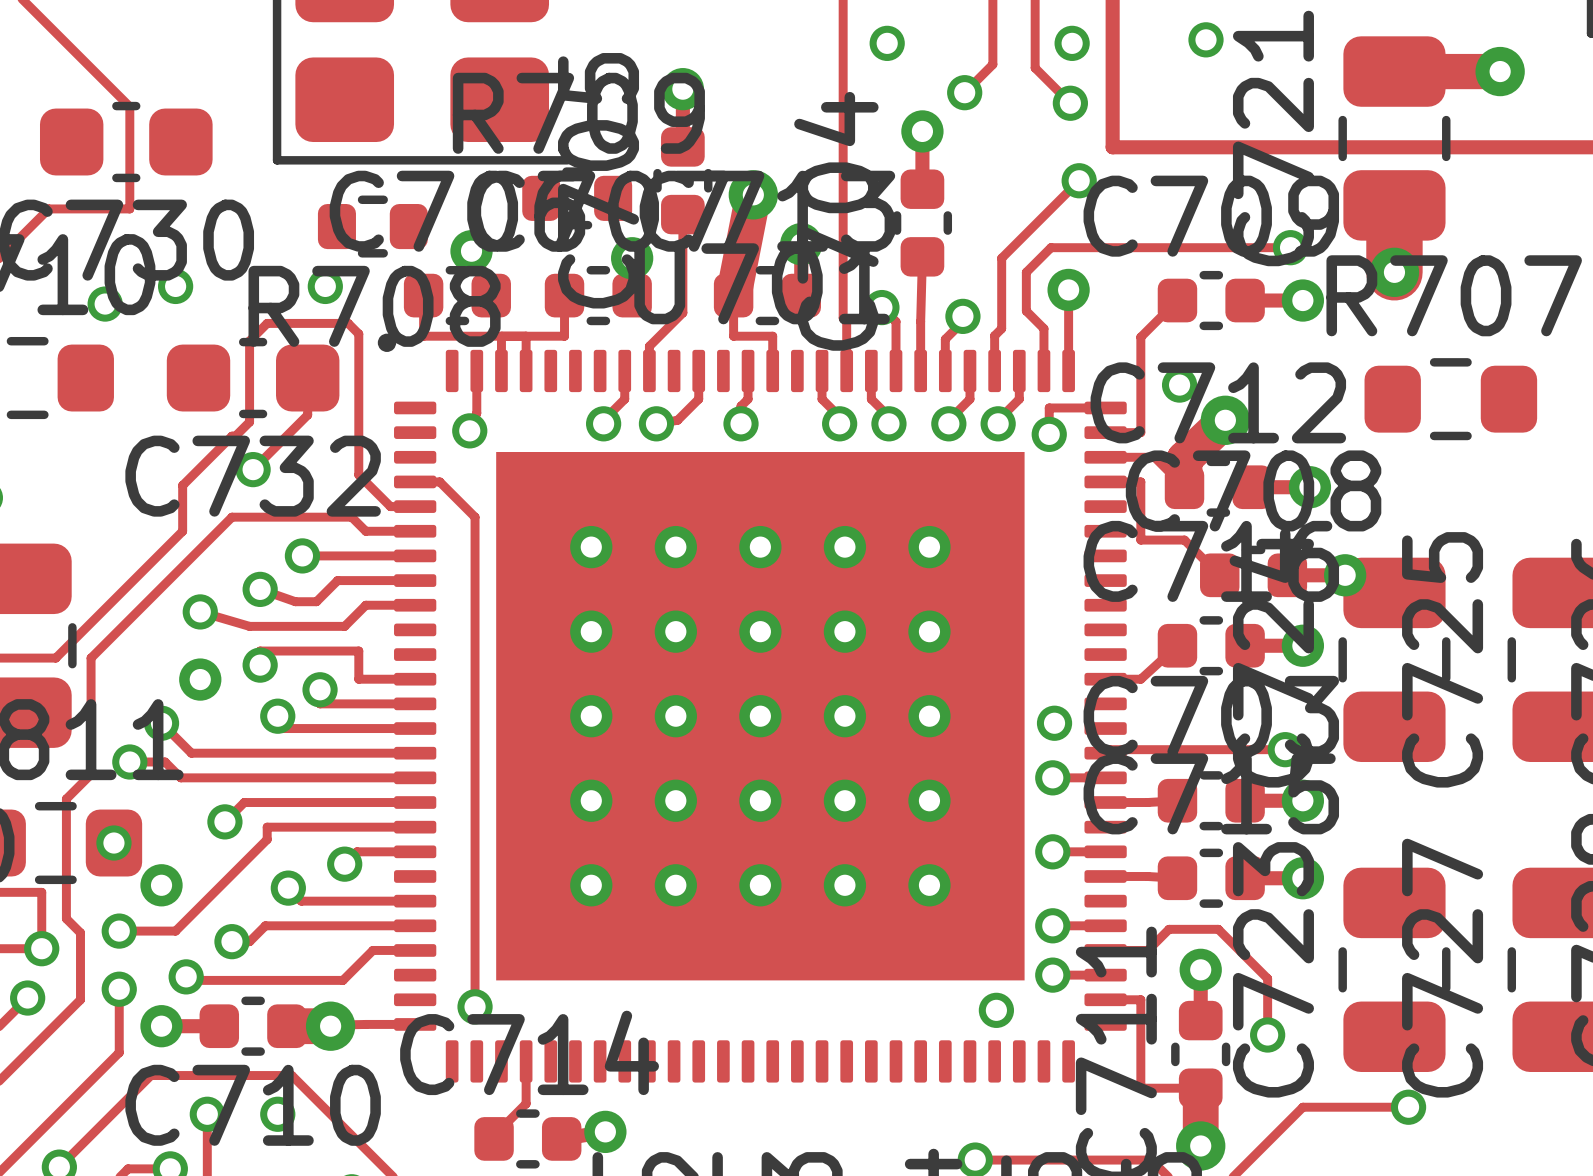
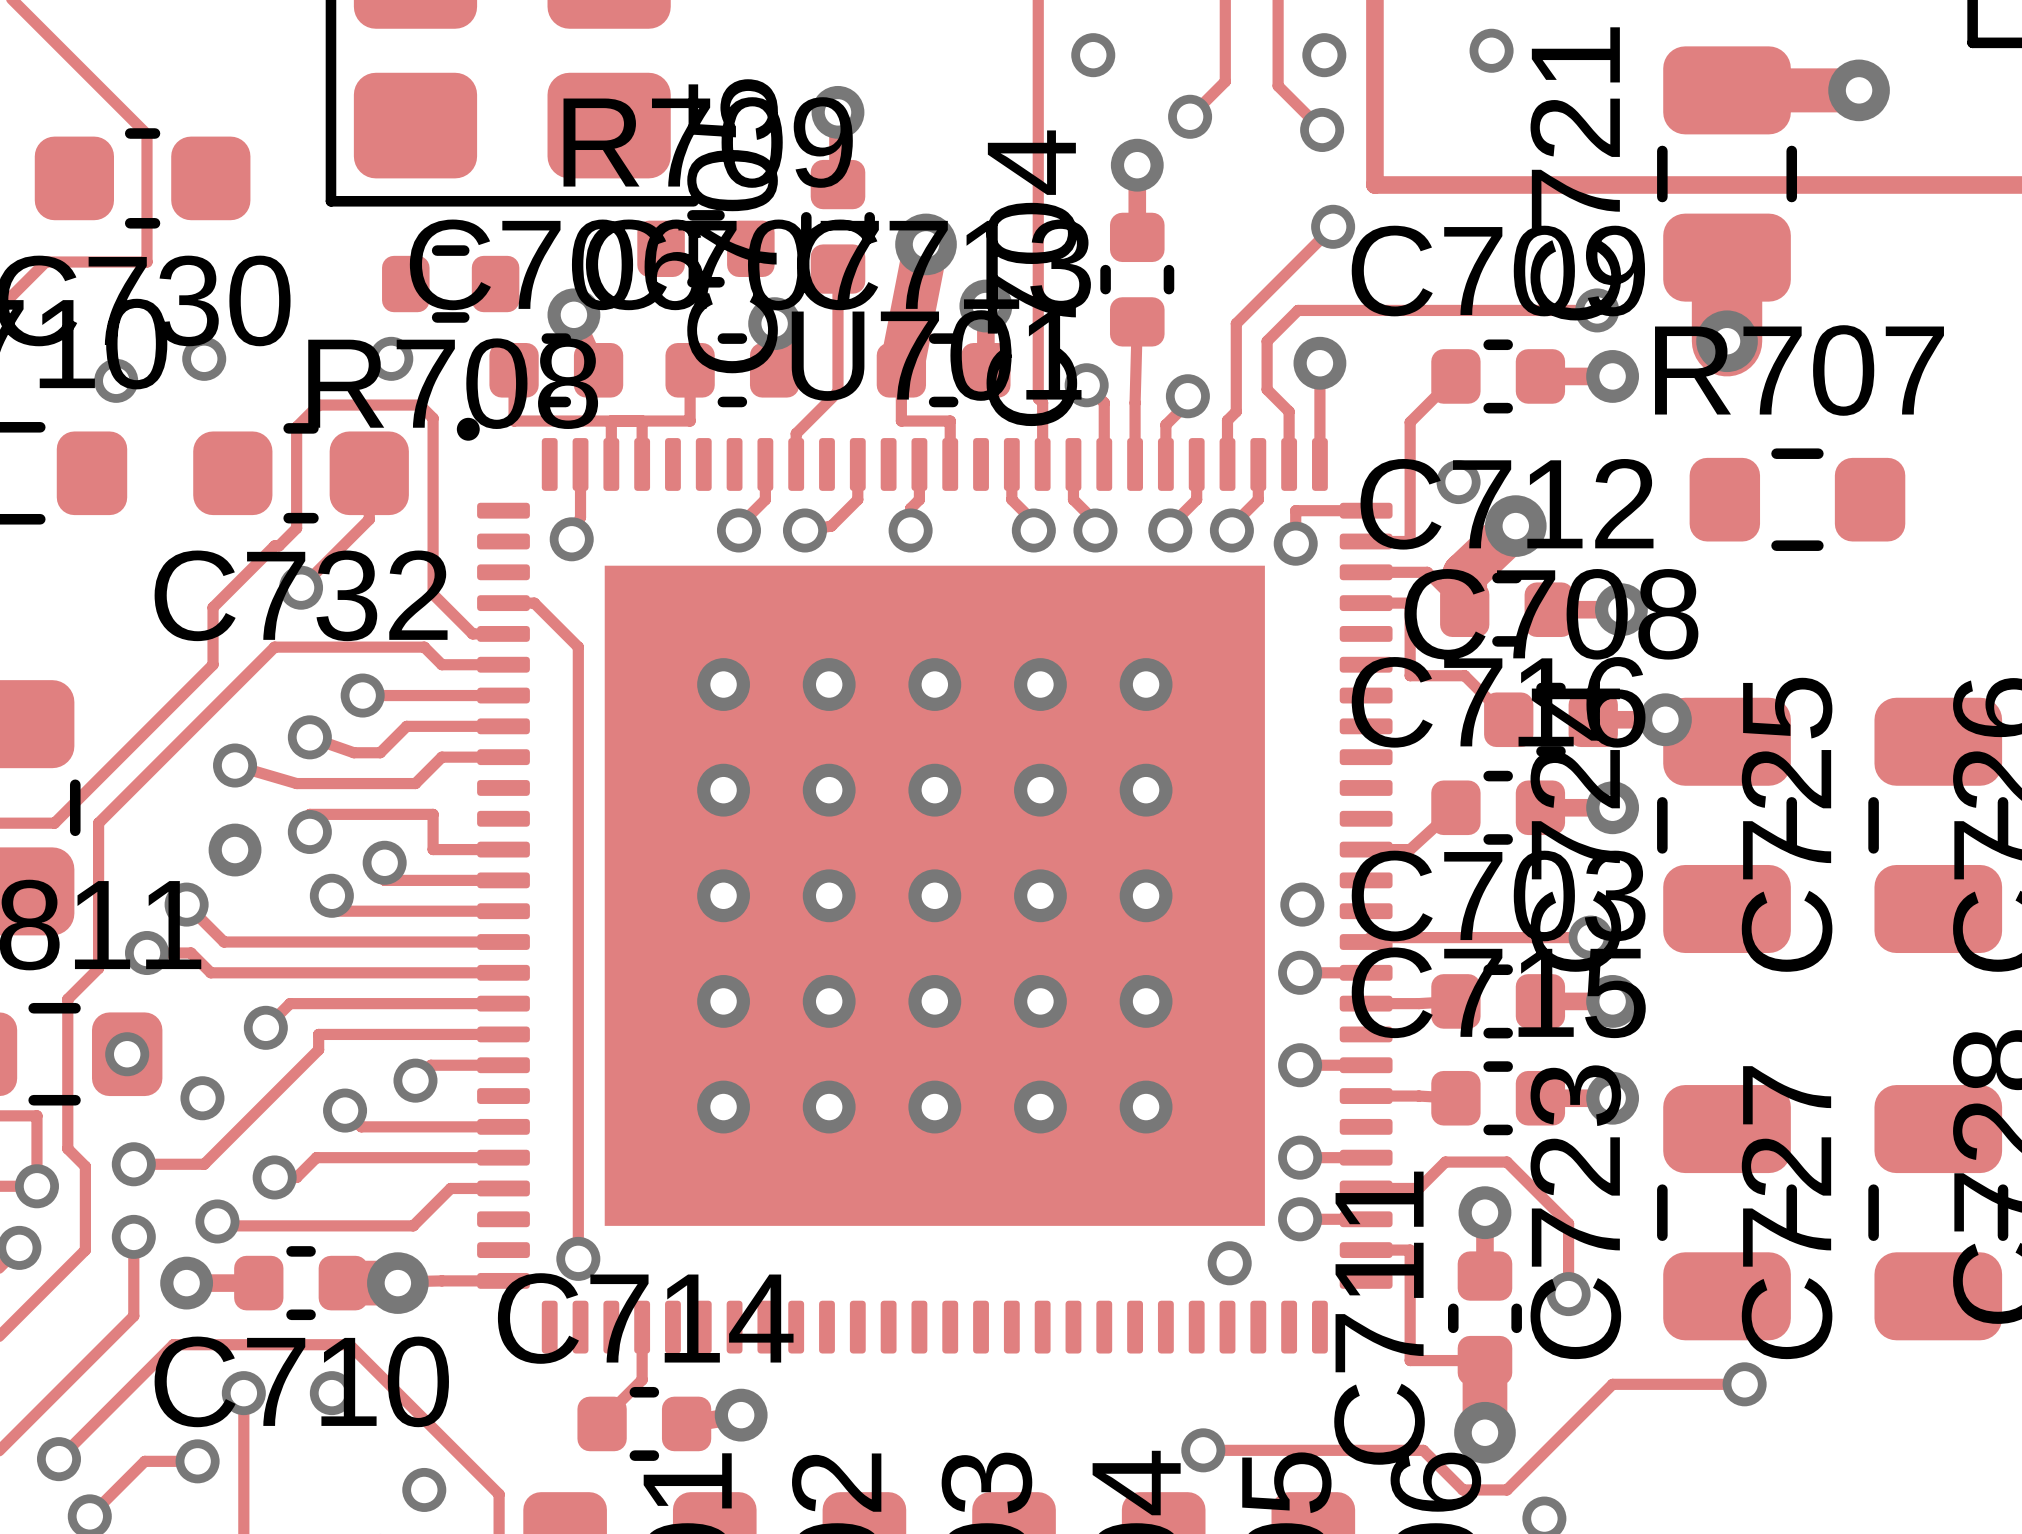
via position: (161, 885) -> (202, 1098)

